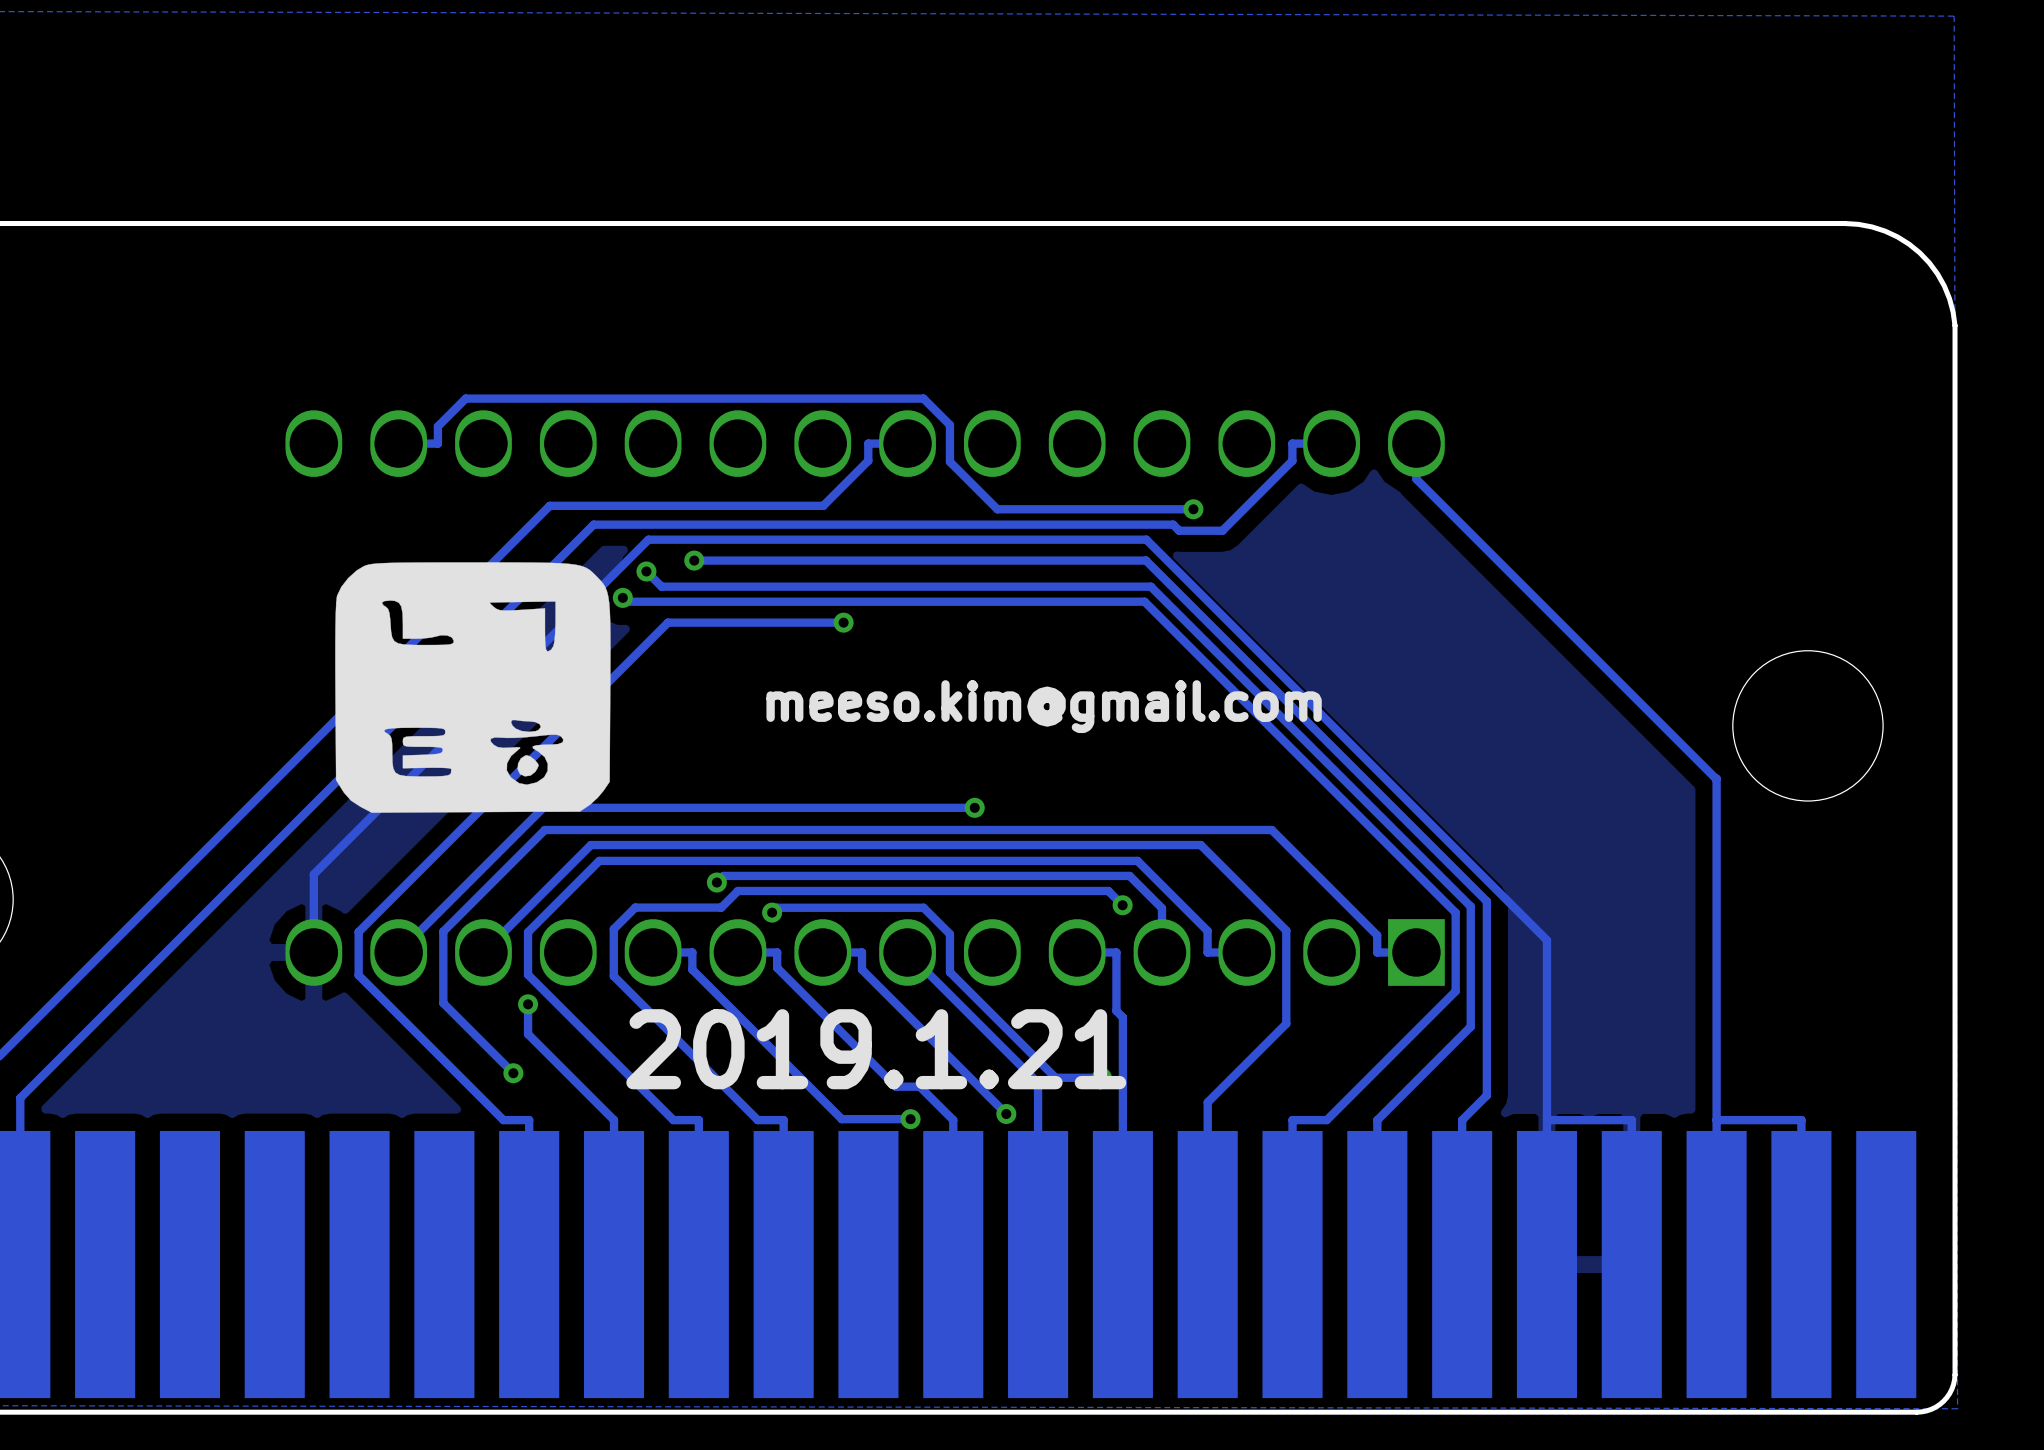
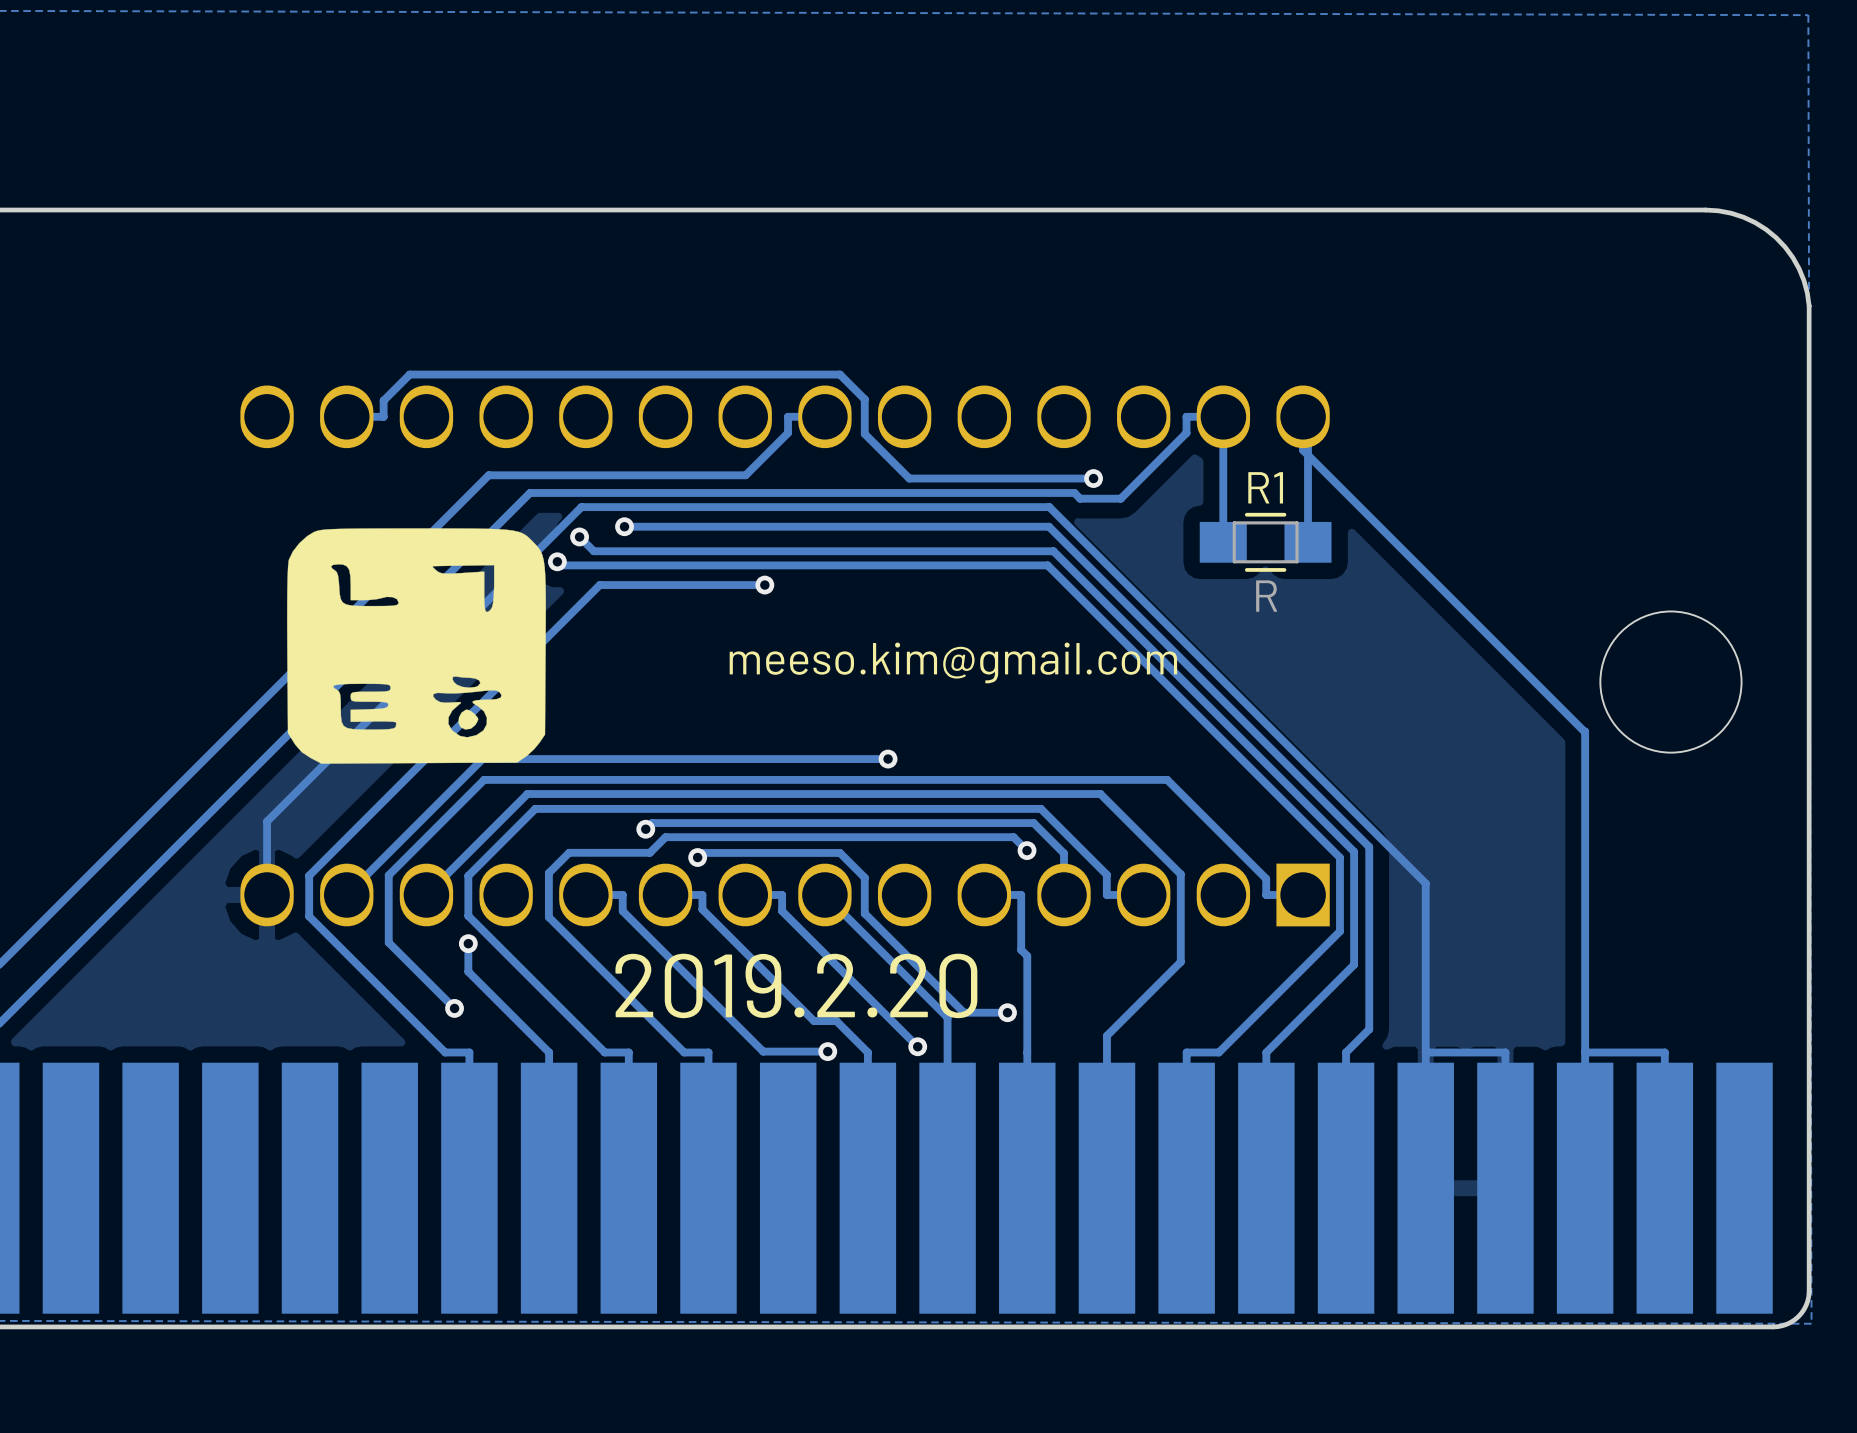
track: none -> (1223, 416) (1223, 542)
track: none -> (1303, 416) (1307, 421) (1307, 542)
R1: none -> R (1265, 542)
text: 2019.1.21 (876, 1049) -> 2019.2.20 (796, 985)

